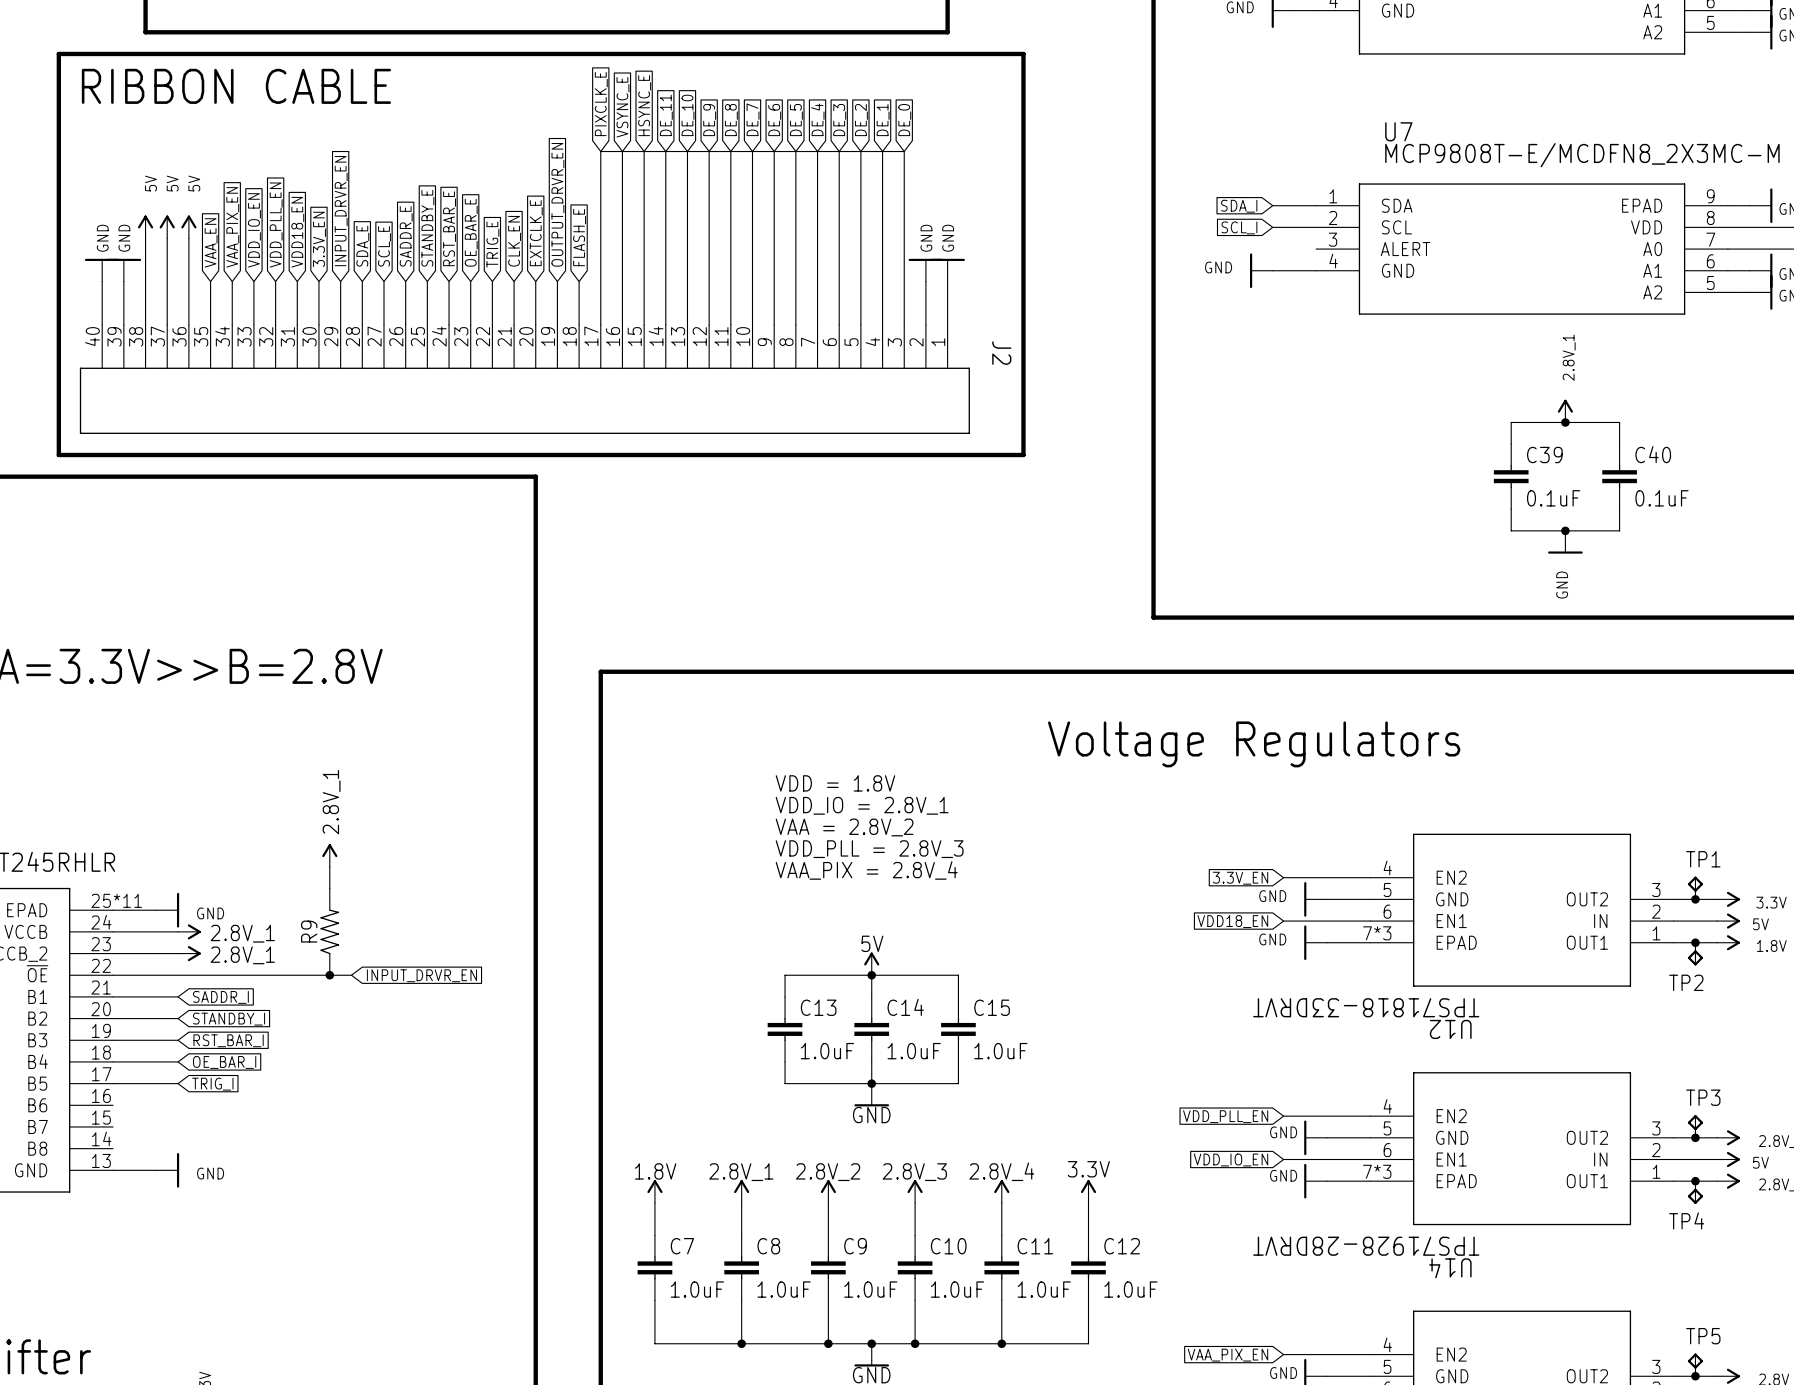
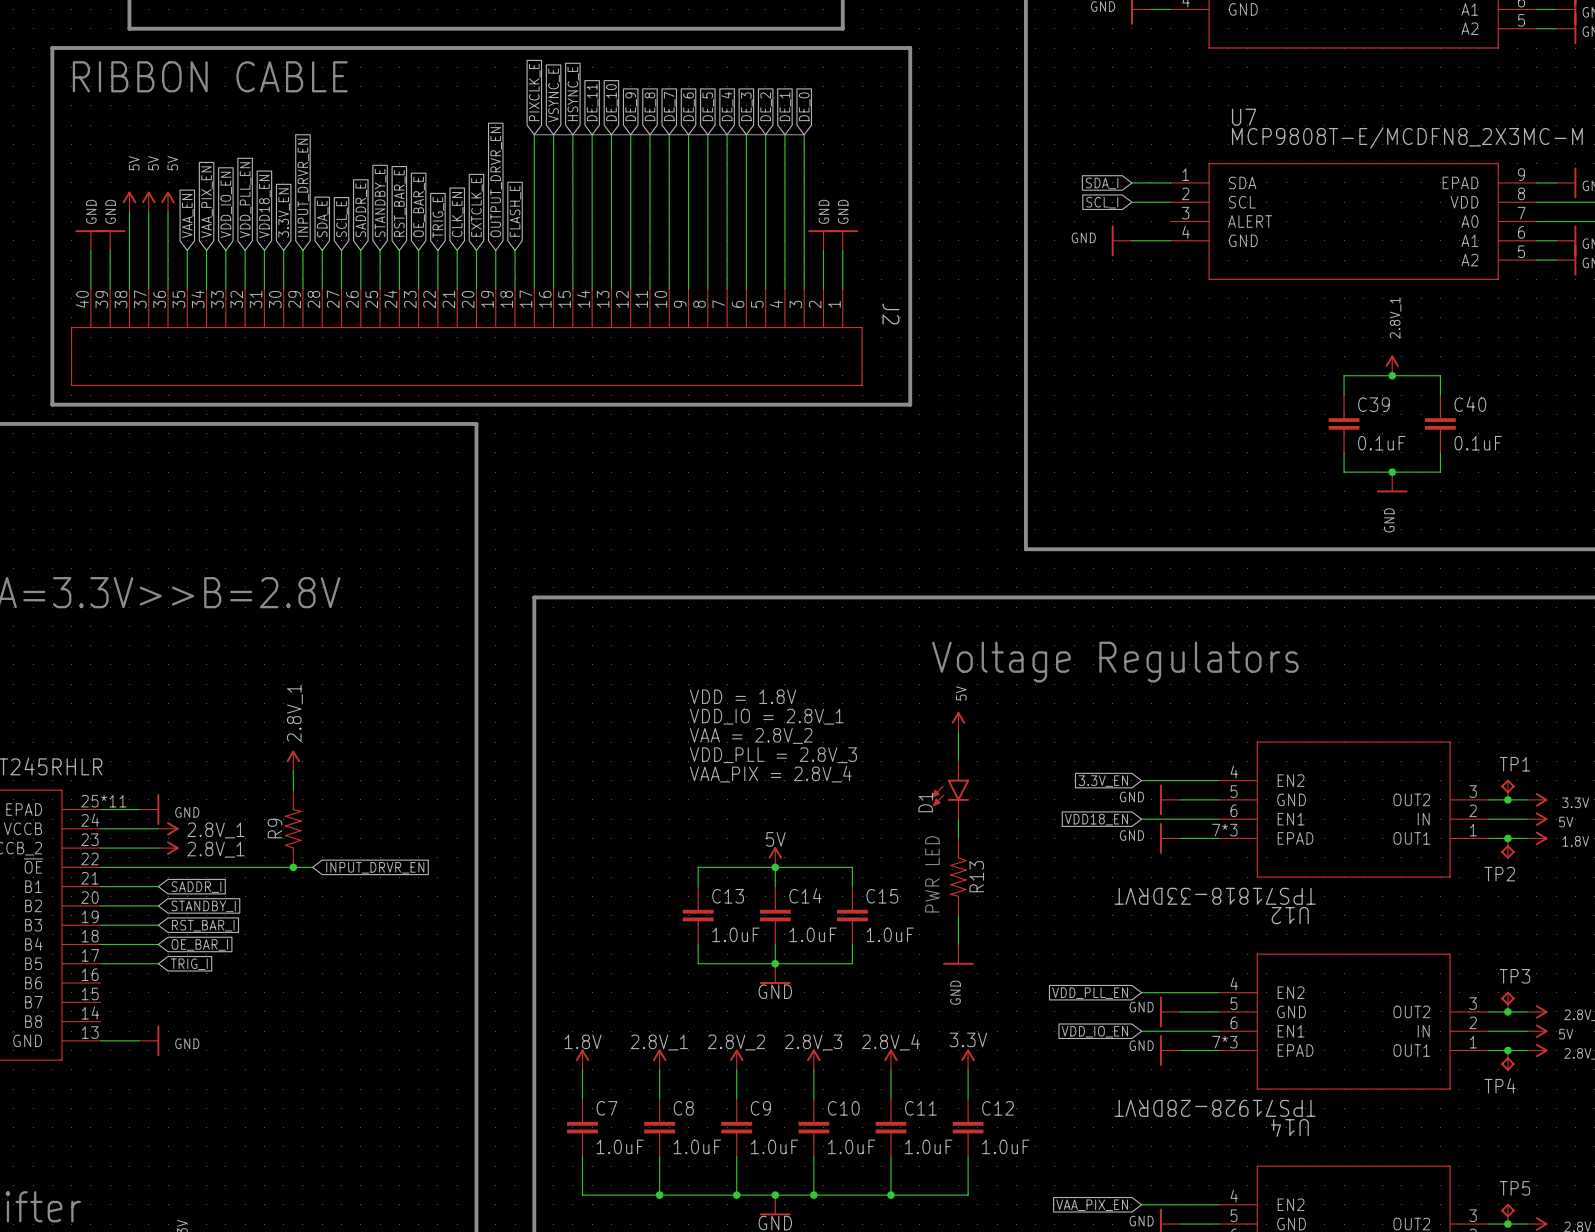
power symbol: none -> 5V (958, 722)
wire: none -> (958, 732) (958, 761)
D1: none -> (950, 790)
wire: none -> (958, 819) (958, 838)
text: none -> PWR LED (932, 874)
R13: none -> (958, 877)
wire: none -> (958, 915) (958, 944)
power symbol: none -> GND (958, 954)

